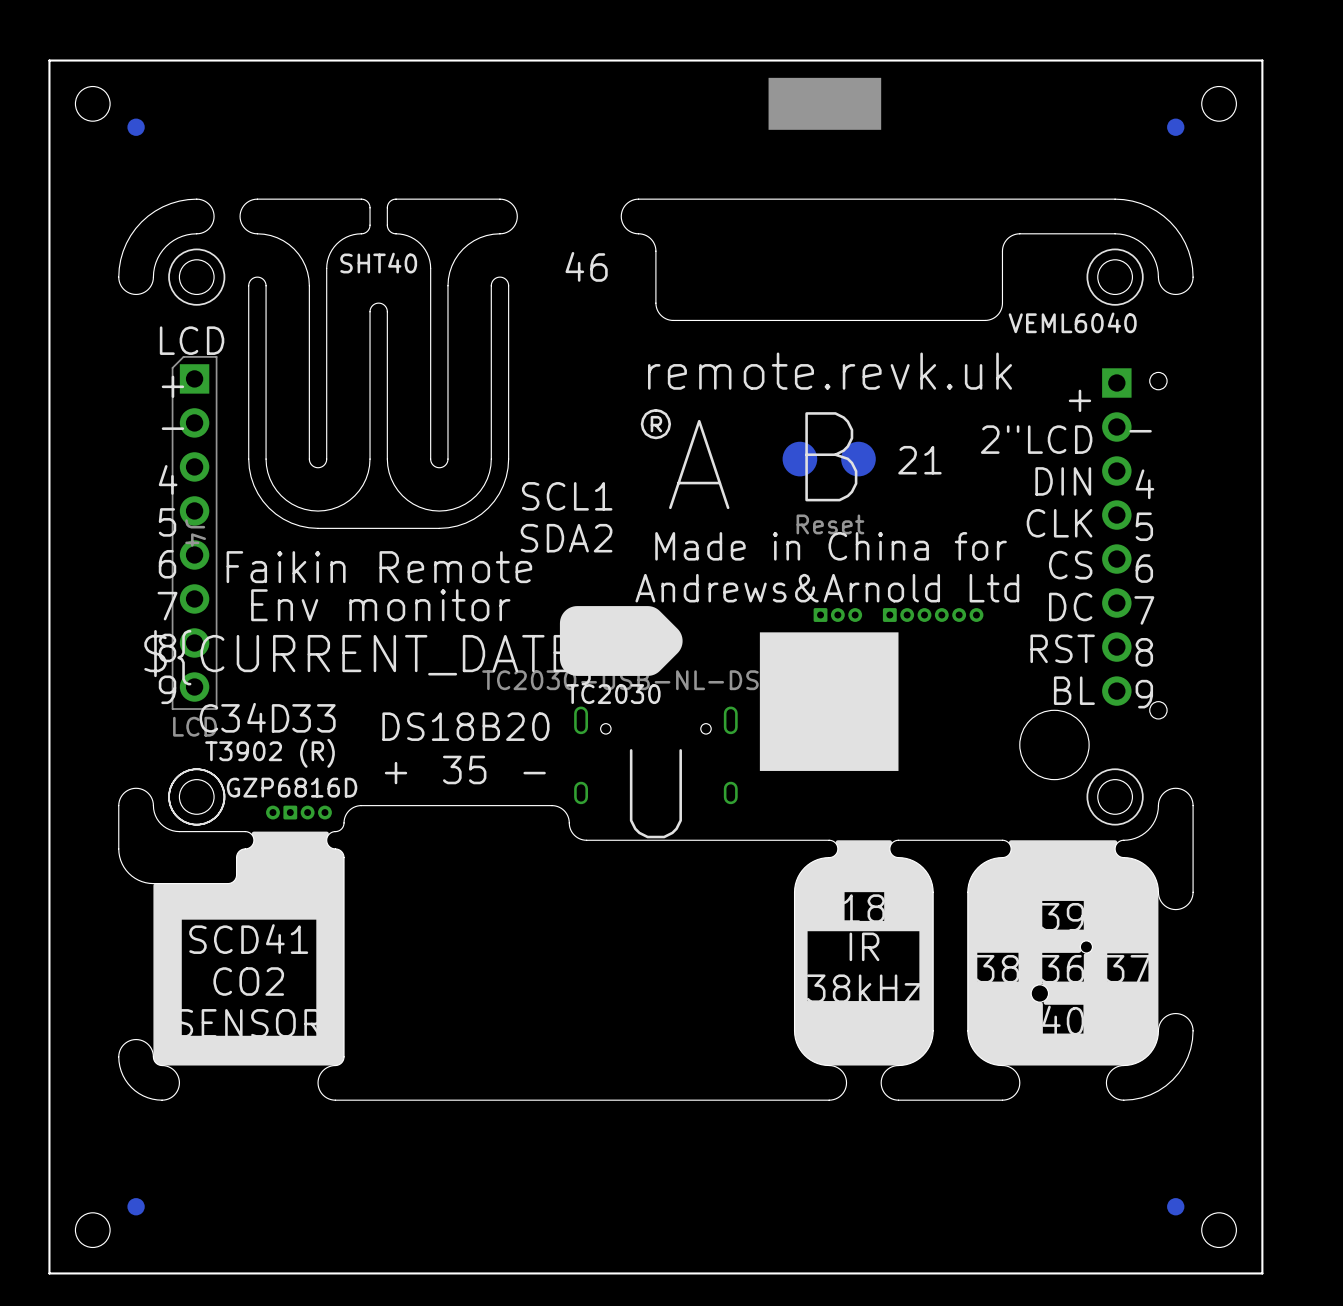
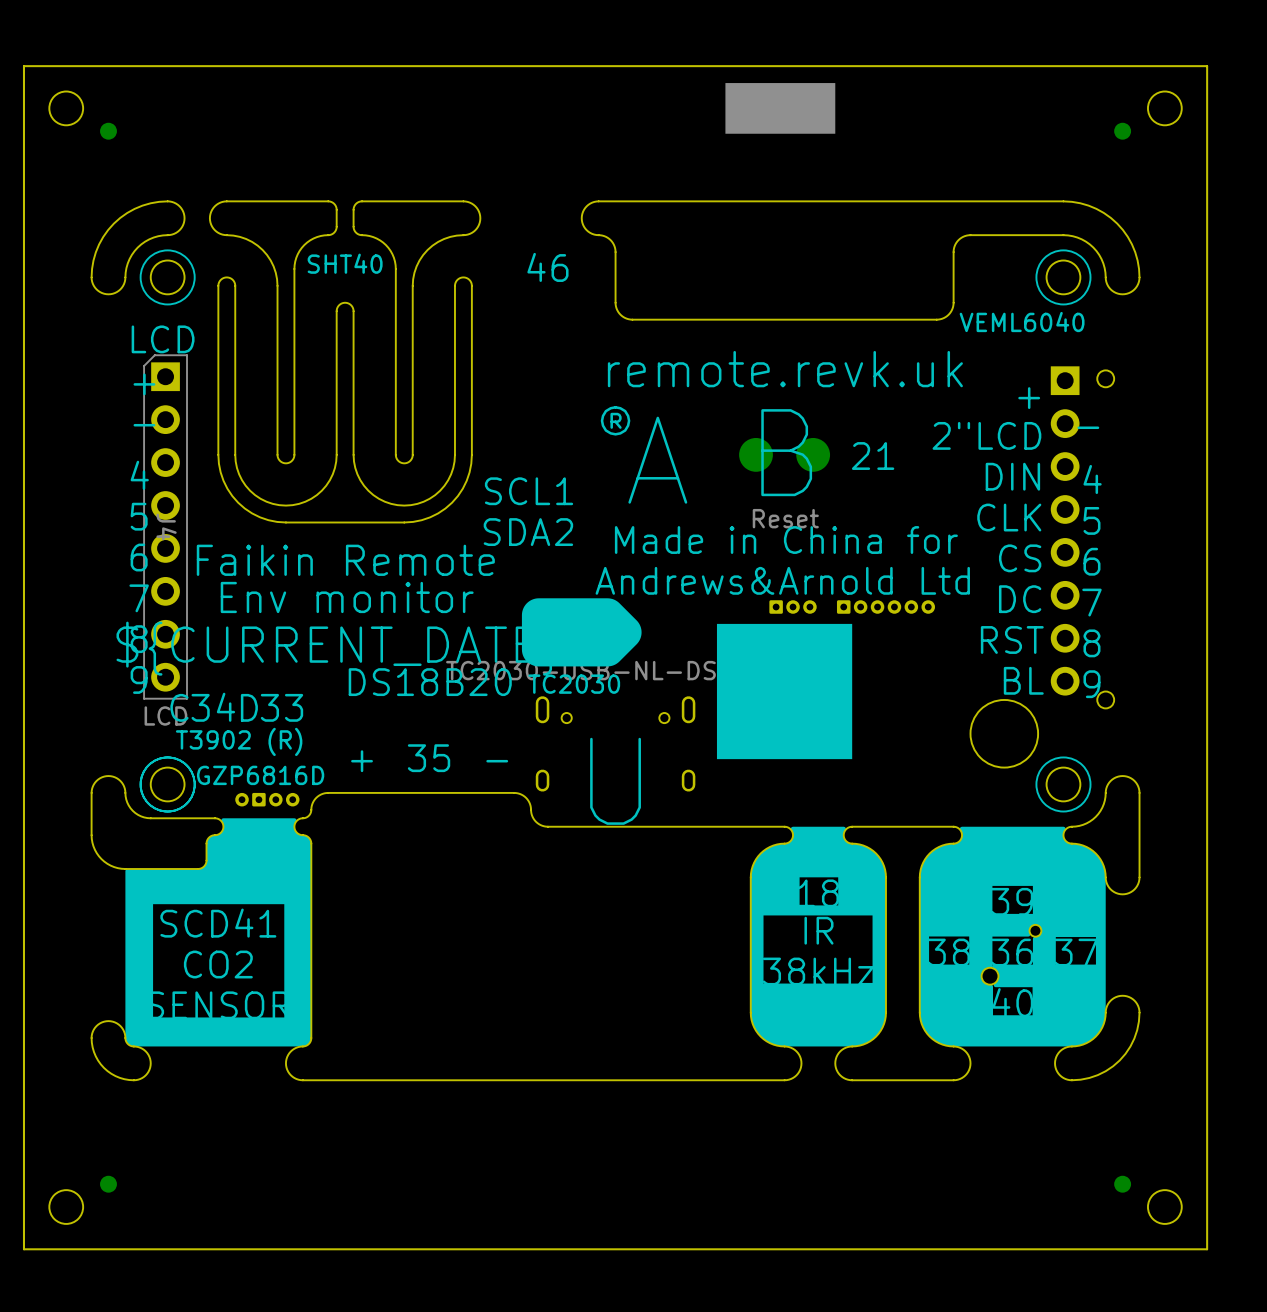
text position: DS18B20 (465, 726) -> DS18B20 (430, 682)

